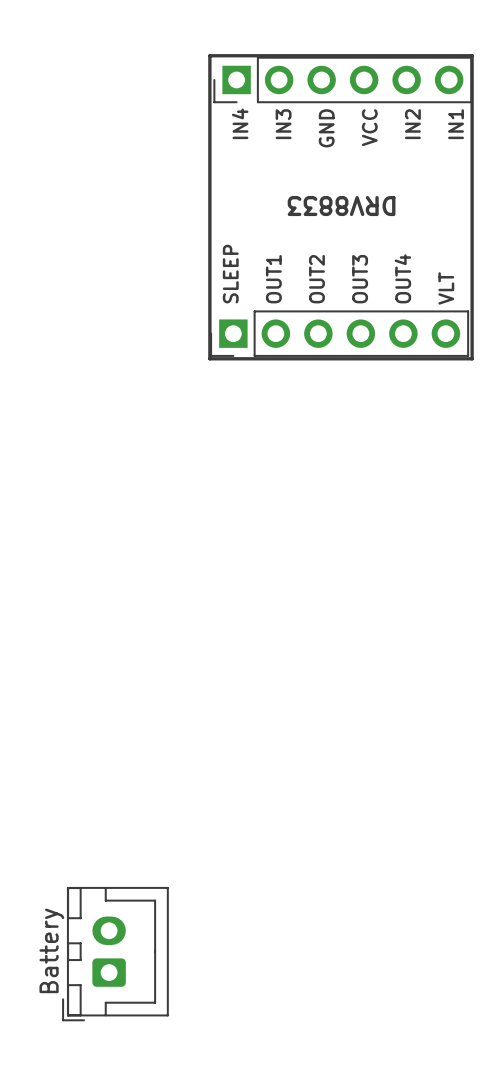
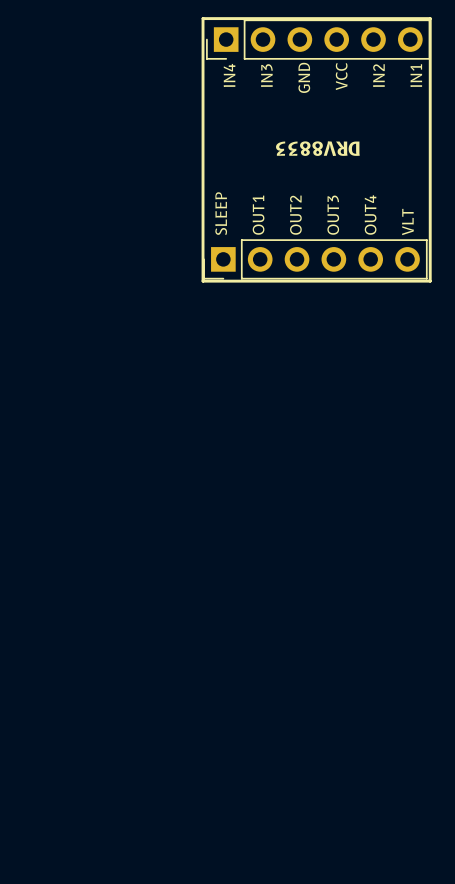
Battery: (115, 954) -> none

